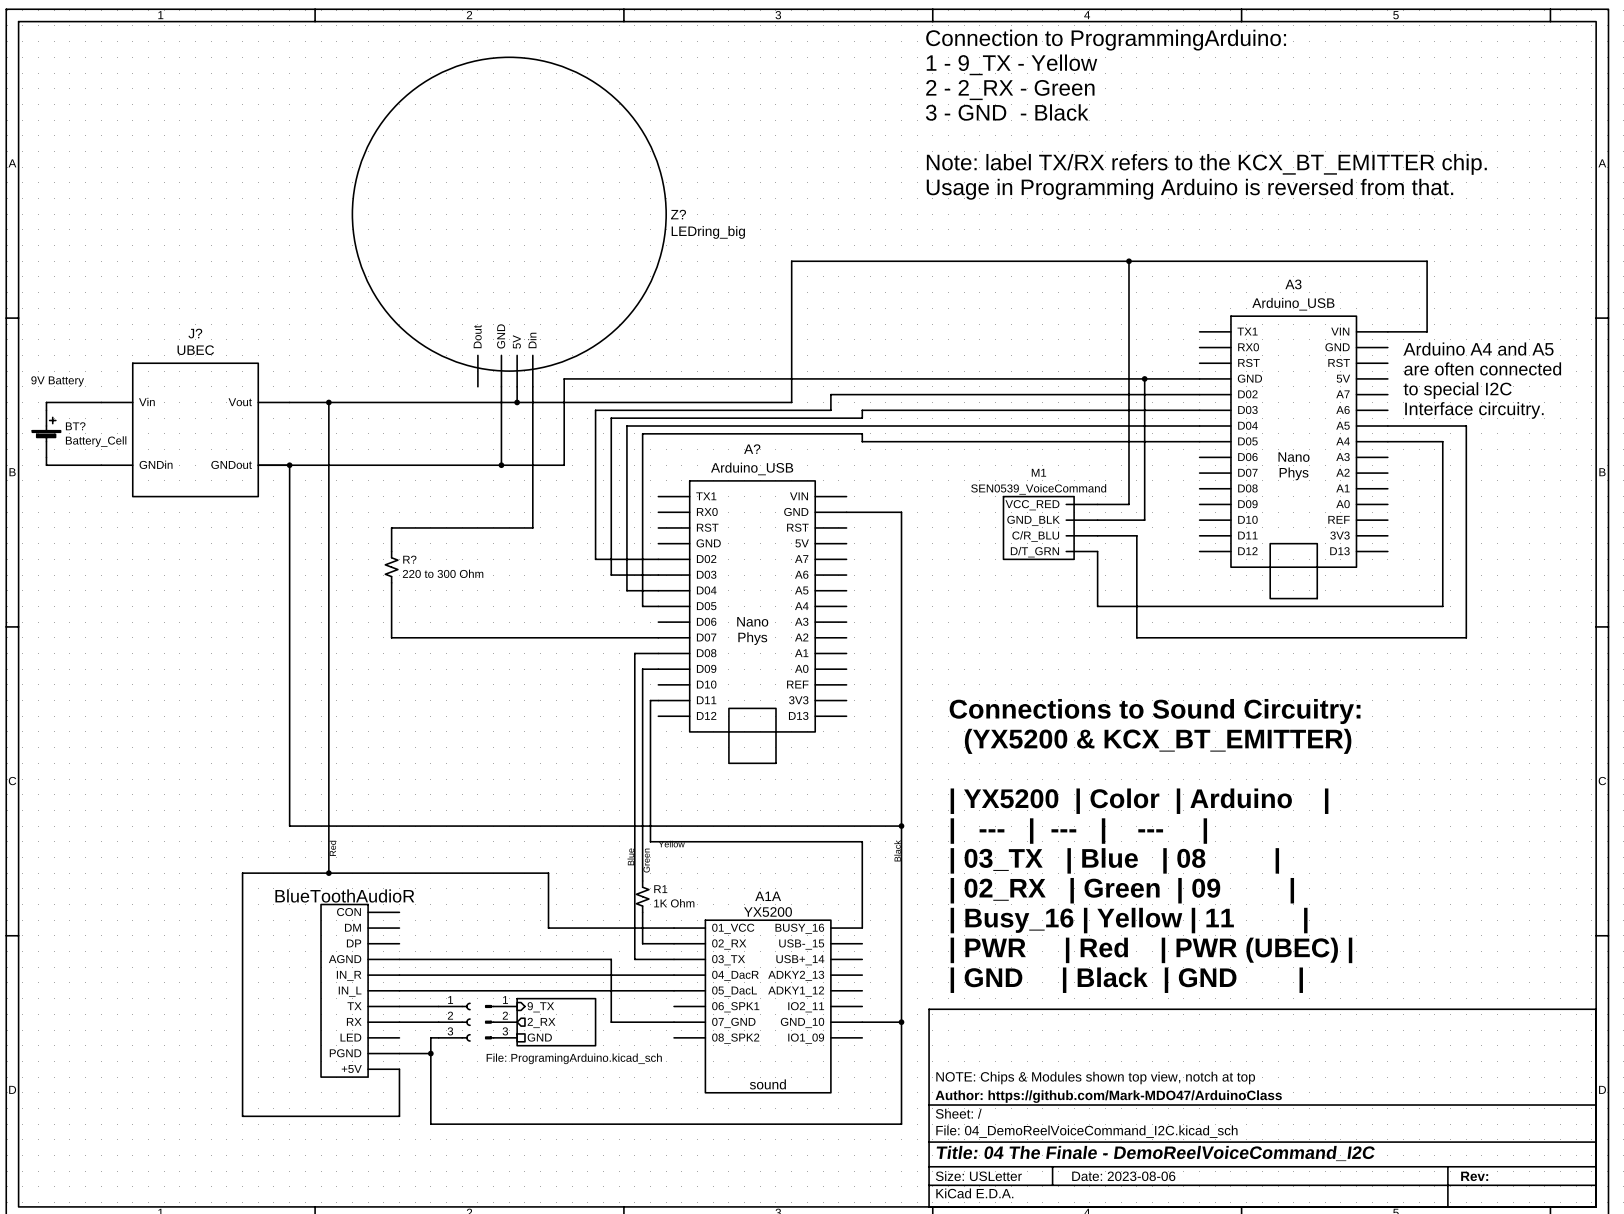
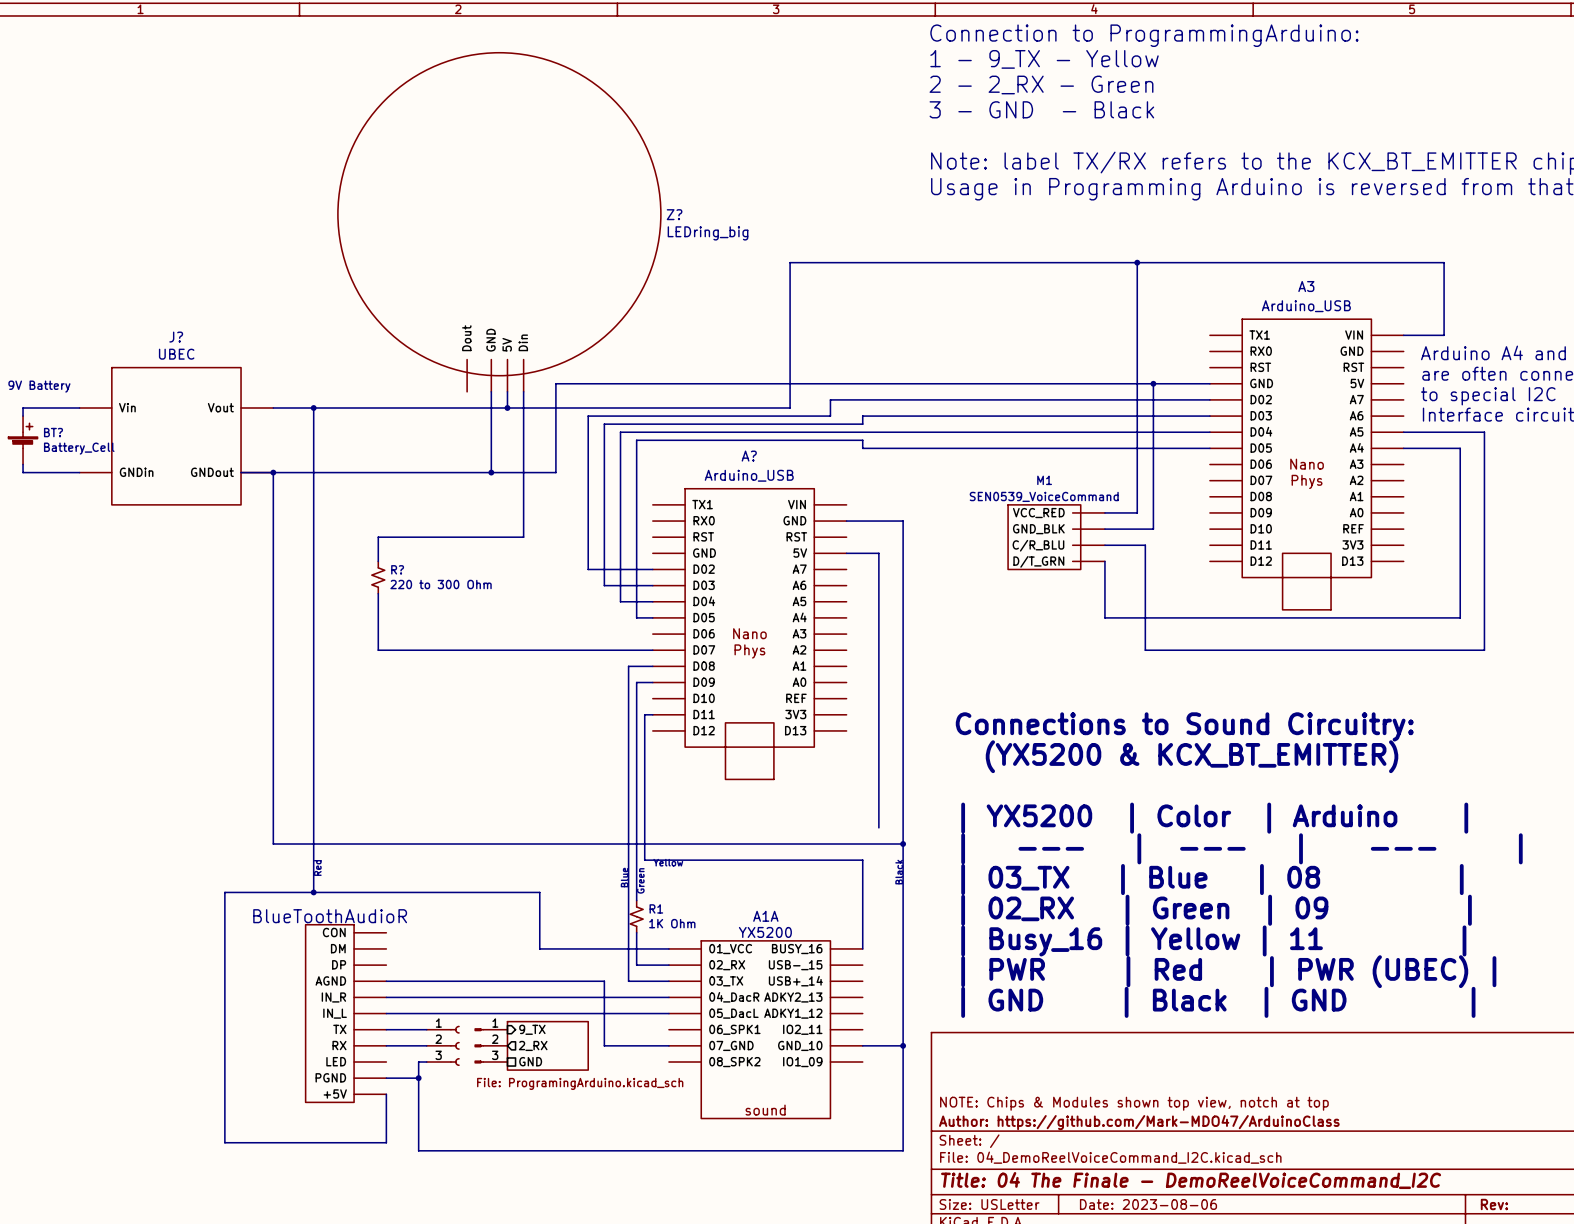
wire: none -> (846, 553) (878, 553) (878, 827)

